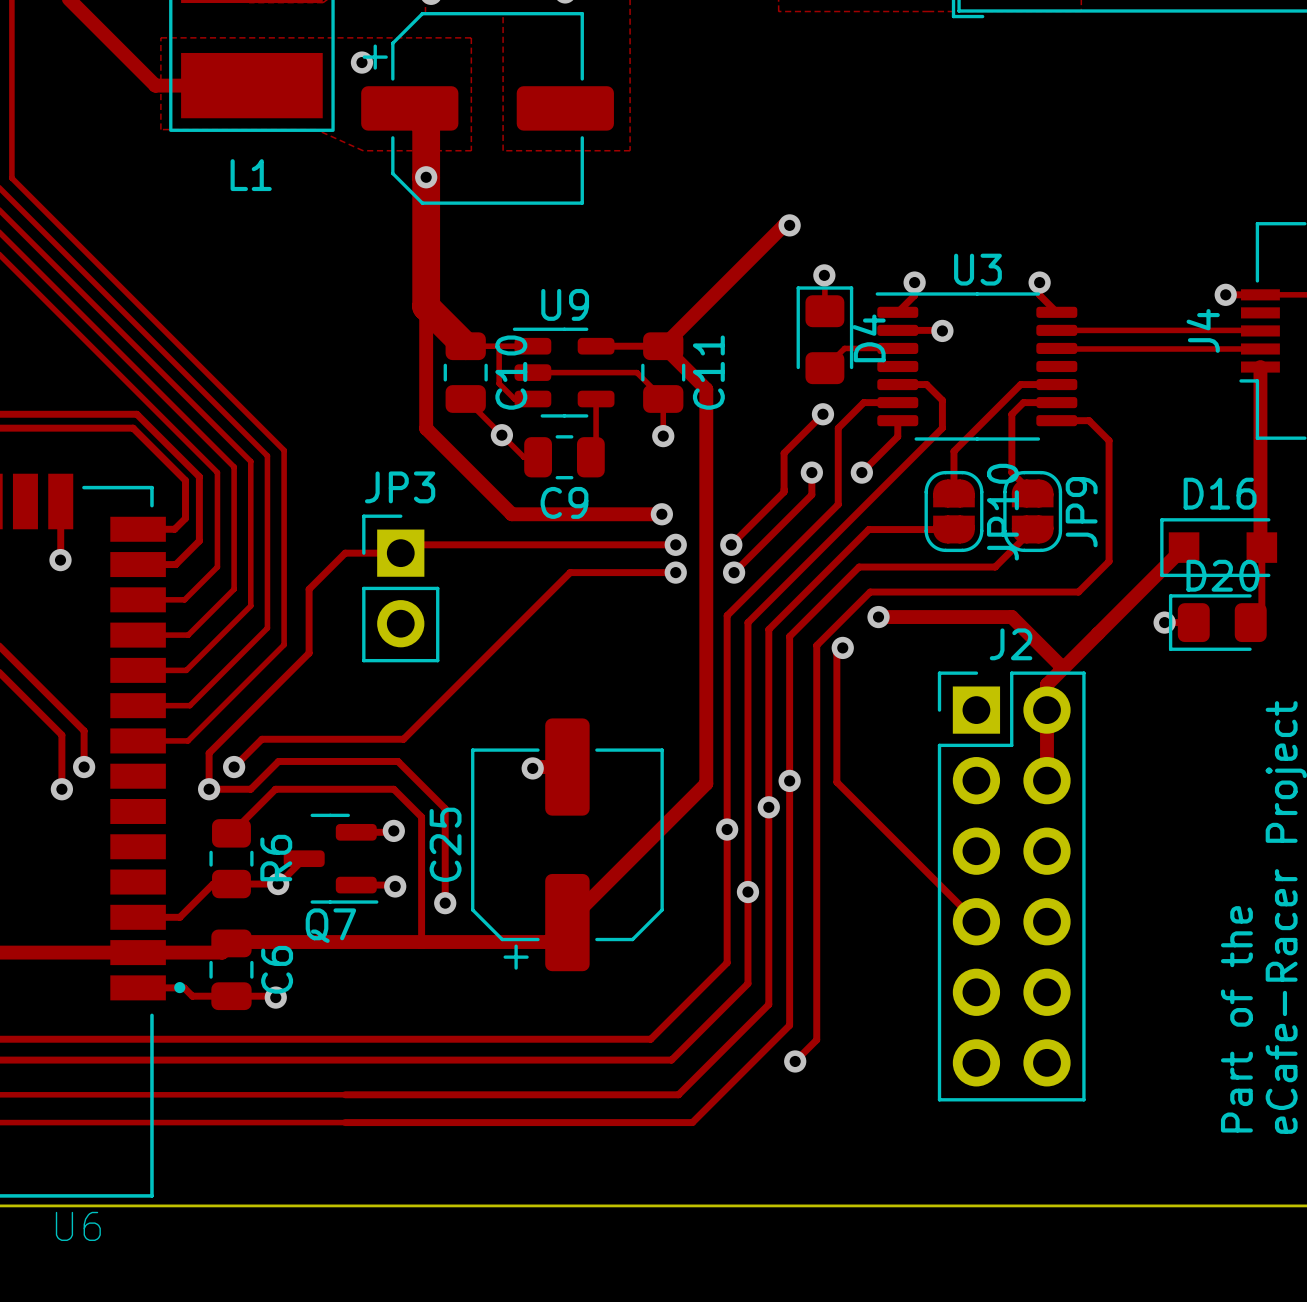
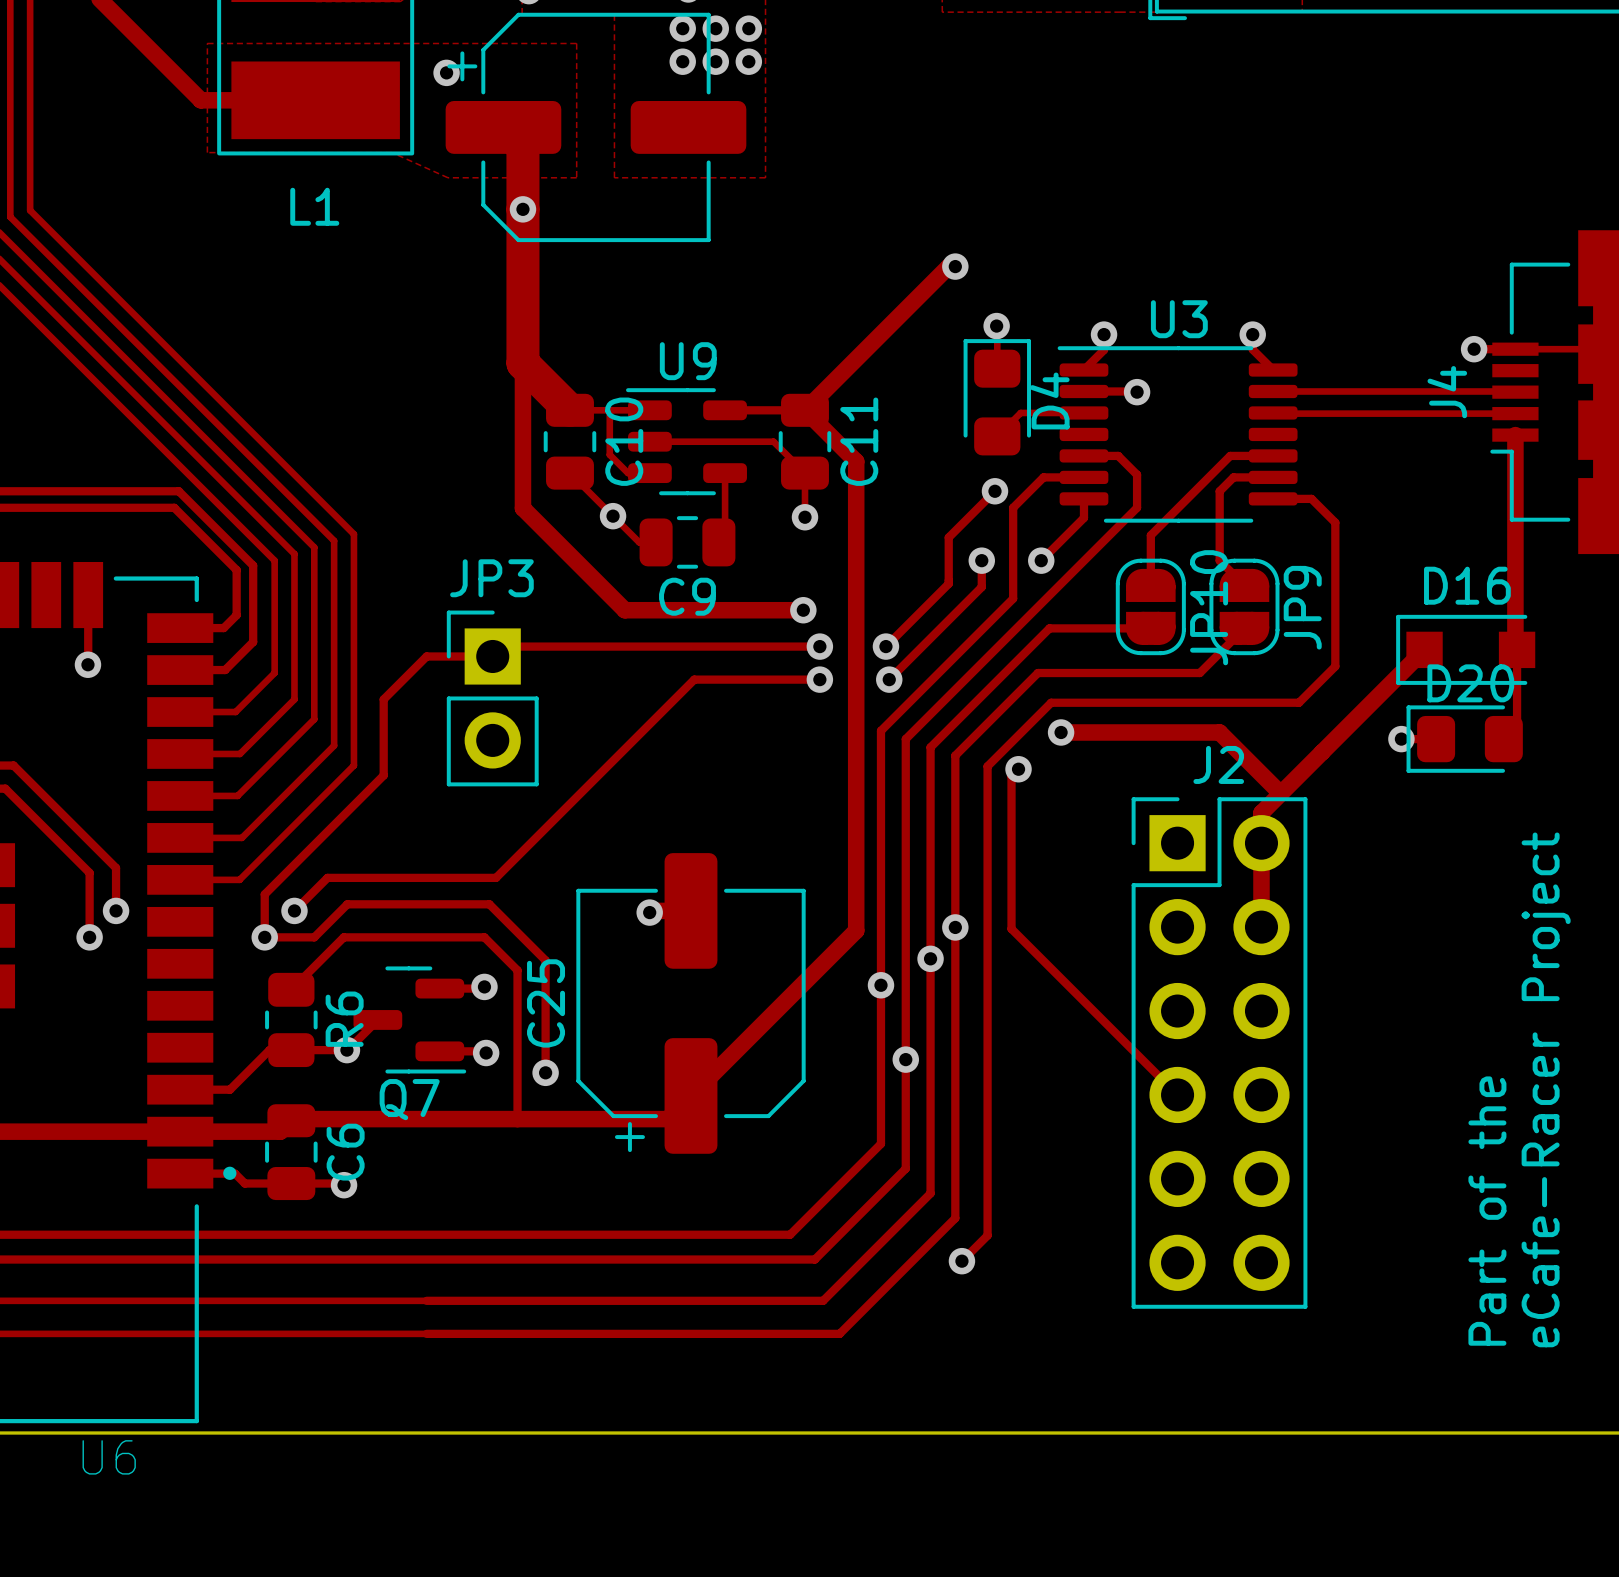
via: none -> (682, 28)
via: none -> (715, 28)
via: none -> (748, 28)
via: none -> (682, 61)
via: none -> (715, 61)
via: none -> (748, 61)

